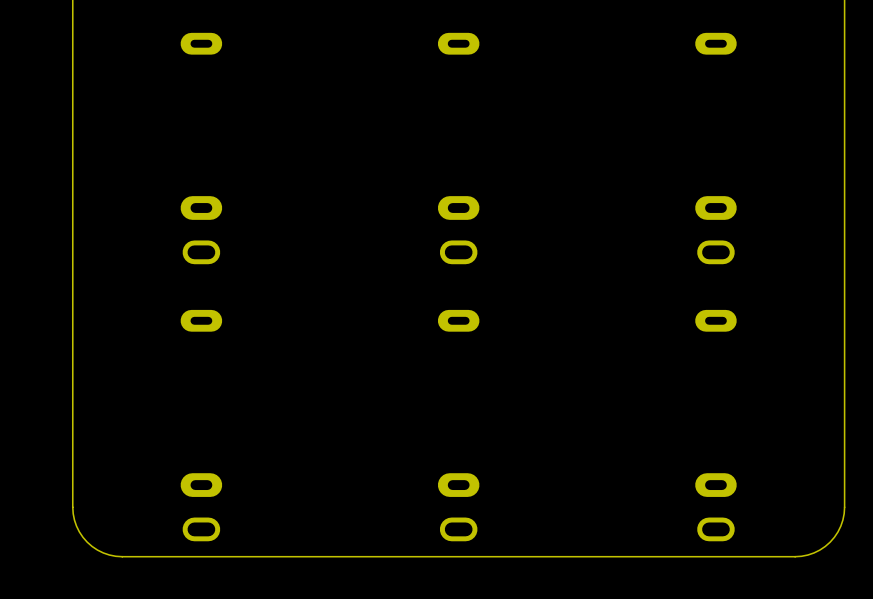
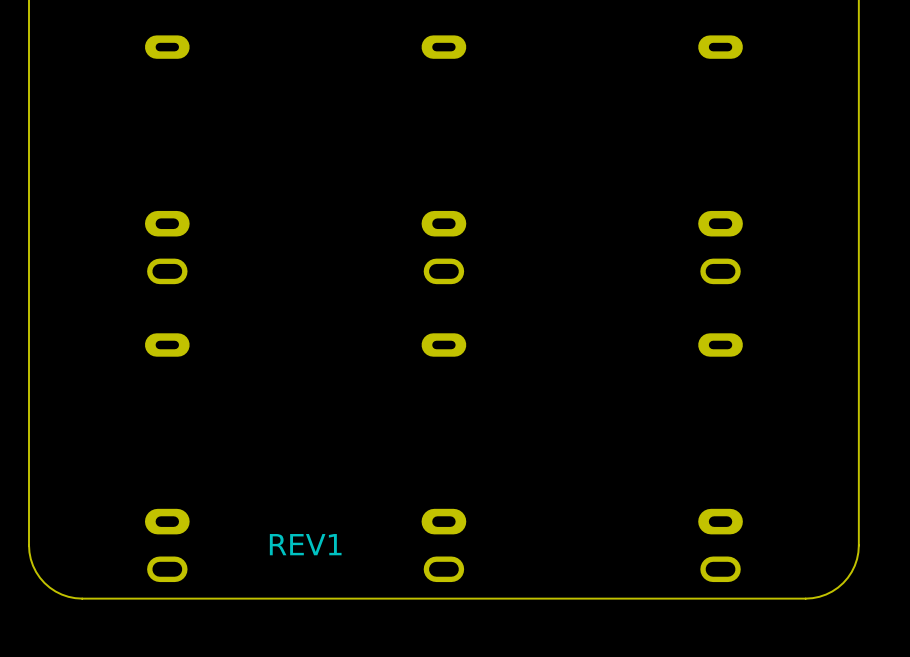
text: none -> REV1 (305, 544)

